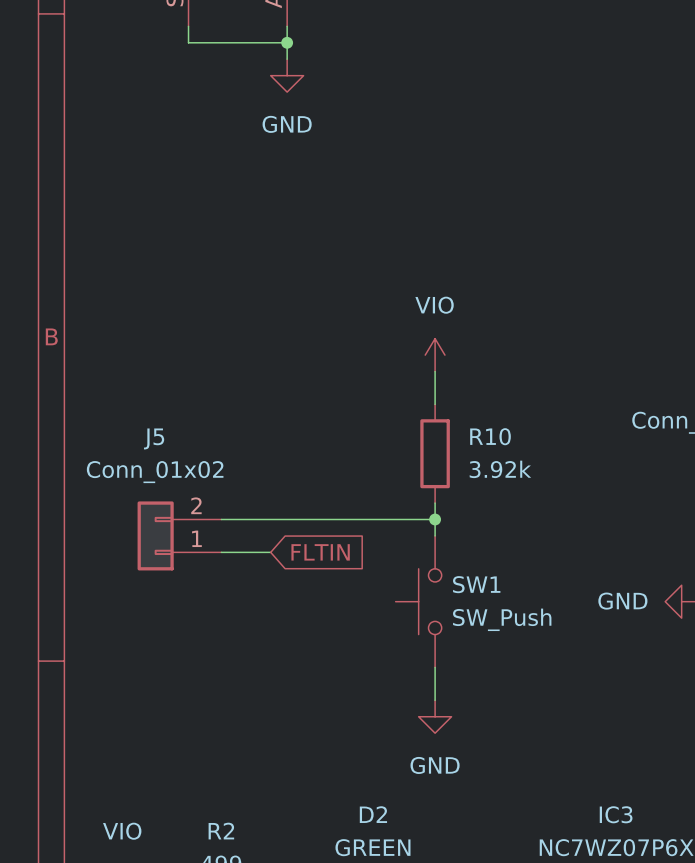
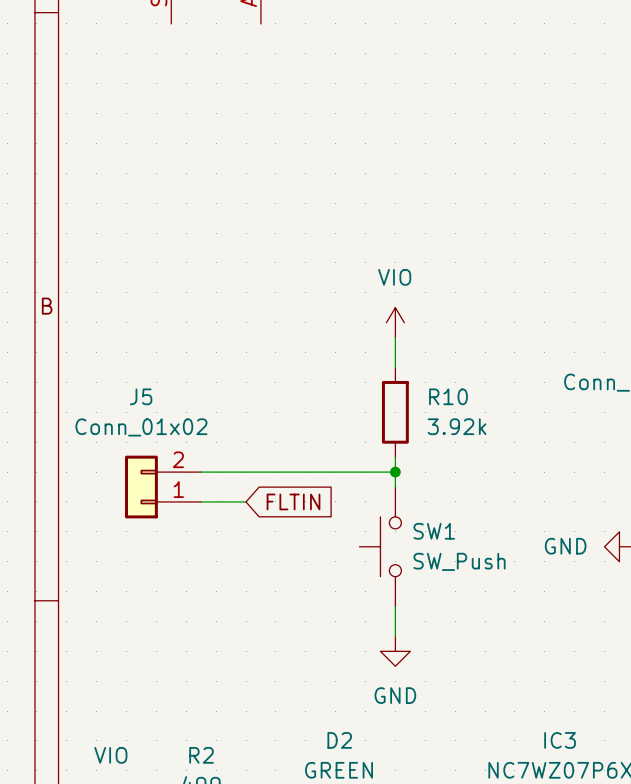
wire: (188, 26) (188, 42) (287, 42) -> none
wire: (287, 26) (287, 59) -> none
junction: (287, 42) -> none
power symbol: GND (287, 75) -> none

